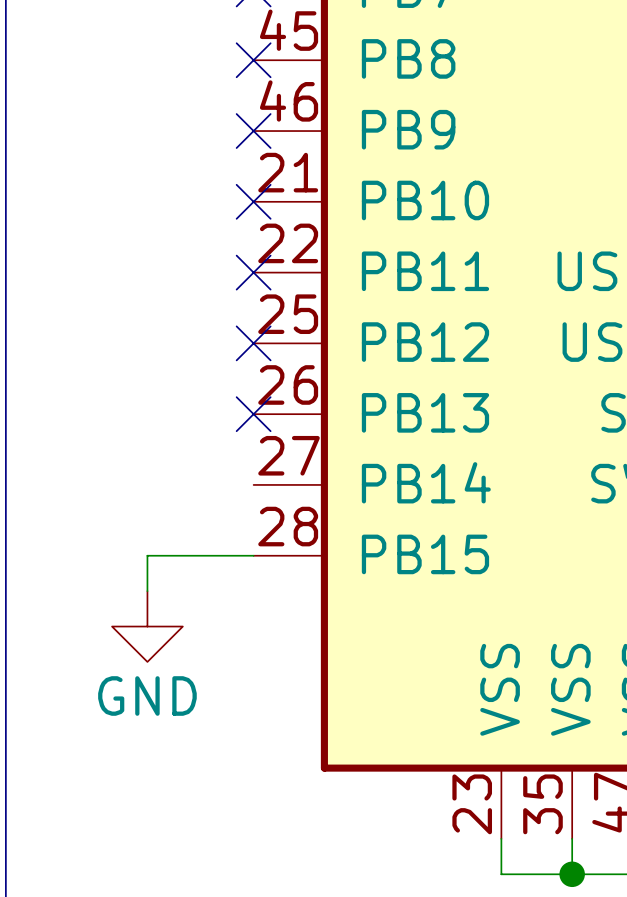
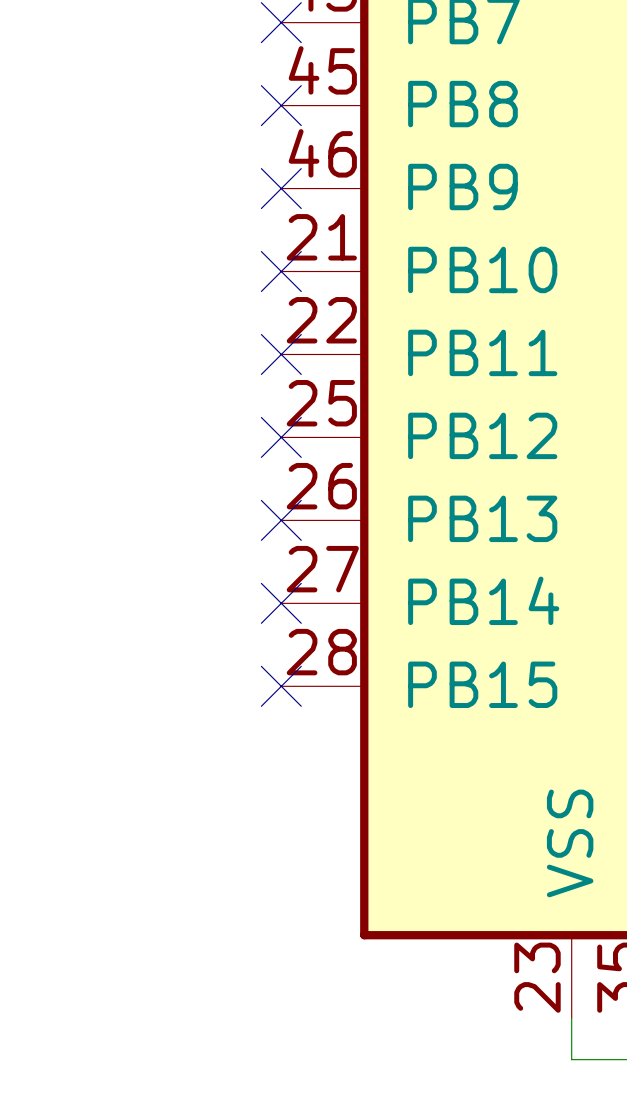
no-connect mark: none -> (281, 603)
wire: (253, 555) (147, 555) (147, 591) -> none
no-connect mark: none -> (281, 686)
power symbol: GND (147, 626) -> none

